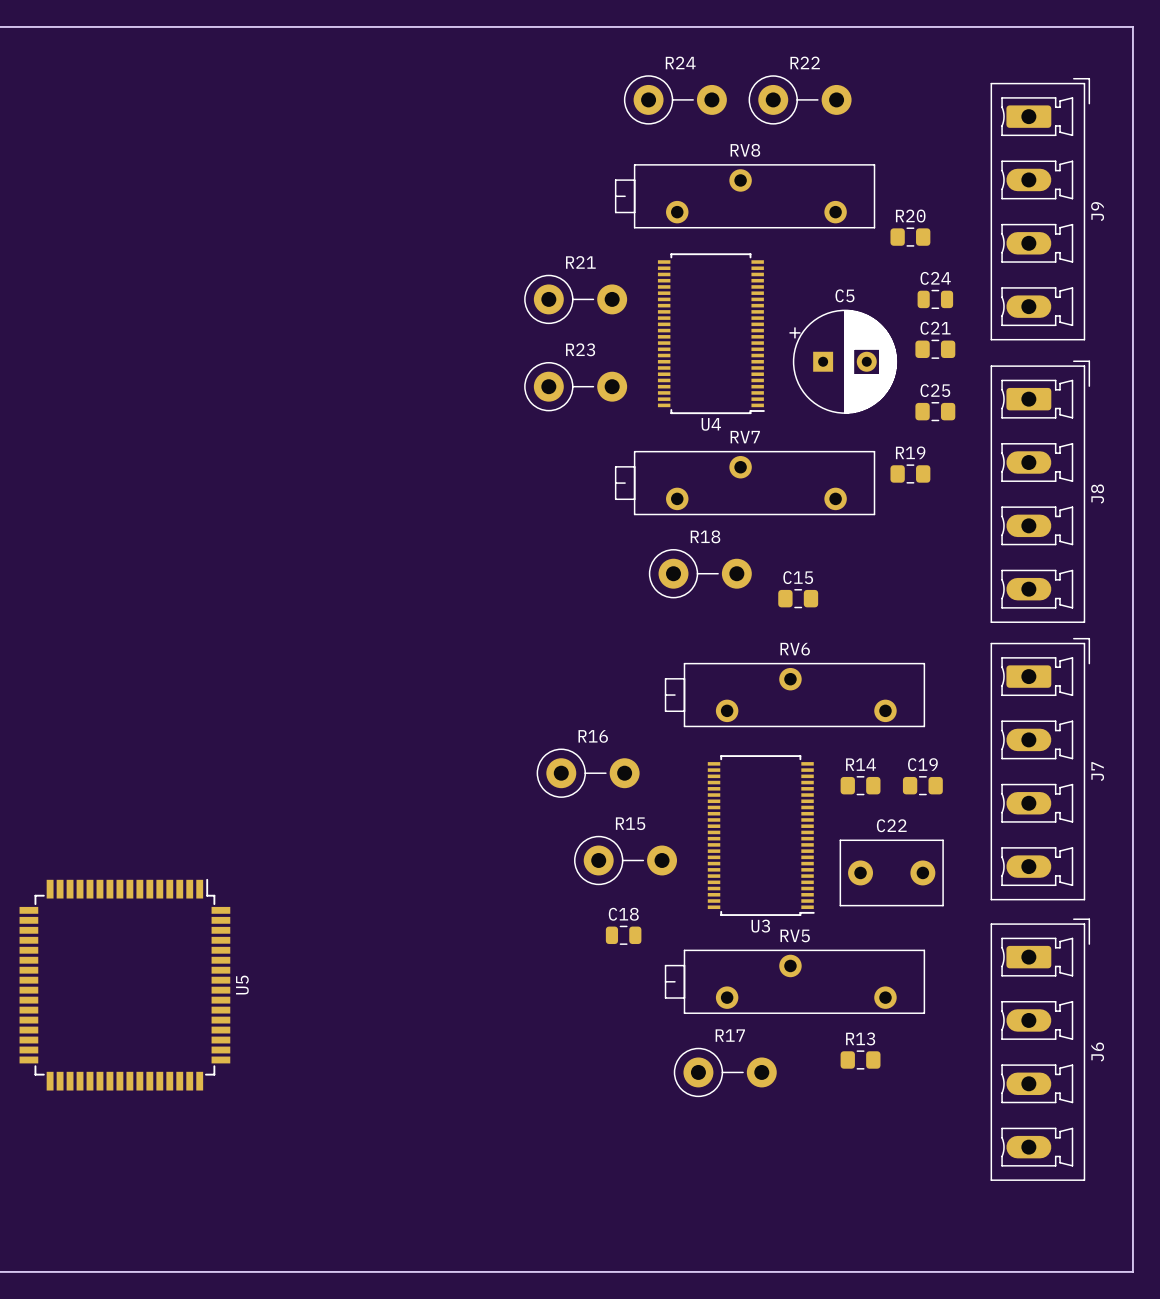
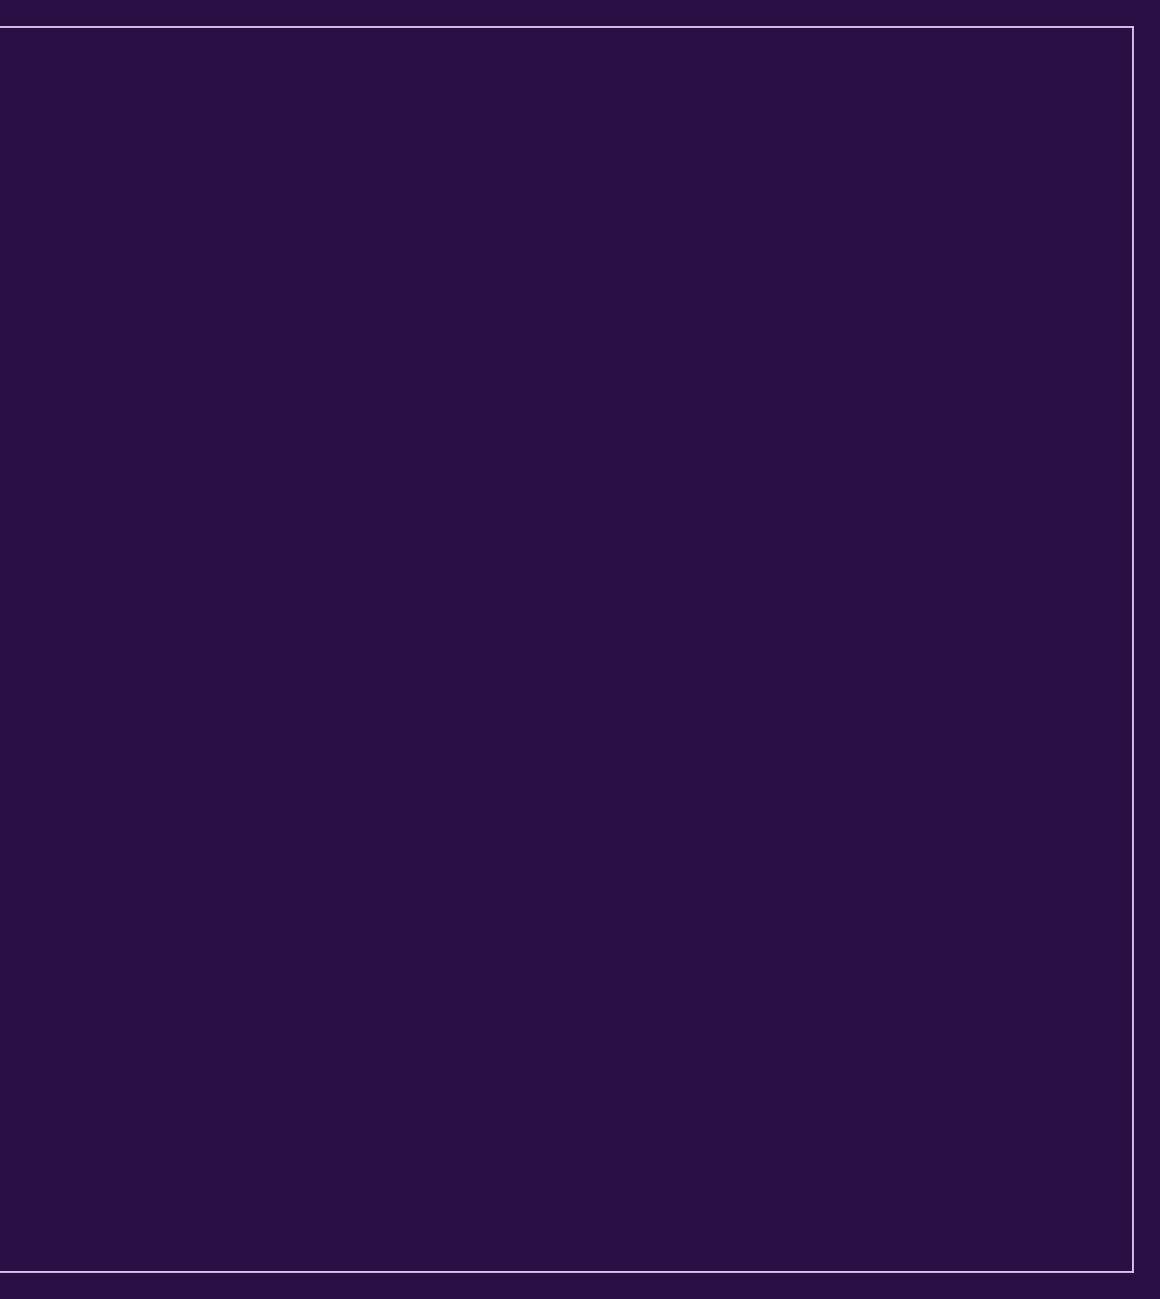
R24: (675, 99) -> none
R22: (800, 99) -> none
RV8: (745, 196) -> none
J9: (1040, 209) -> none
R20: (910, 237) -> none
R21: (575, 299) -> none
C24: (935, 299) -> none
U4: (711, 333) -> none
C21: (935, 349) -> none
C5: (843, 361) -> none
R23: (575, 386) -> none
C25: (935, 411) -> none
R19: (910, 473) -> none
RV7: (745, 483) -> none
J8: (1040, 491) -> none
R18: (700, 573) -> none
C15: (798, 598) -> none
RV6: (794, 695) -> none
J7: (1040, 769) -> none
R16: (588, 773) -> none
R14: (860, 785) -> none
C19: (922, 785) -> none
U3: (761, 835) -> none
R15: (625, 860) -> none
C22: (891, 872) -> none
C18: (623, 935) -> none
RV5: (794, 981) -> none
U5: (124, 984) -> none
J6: (1040, 1049) -> none
R13: (860, 1059) -> none
R17: (725, 1072) -> none

